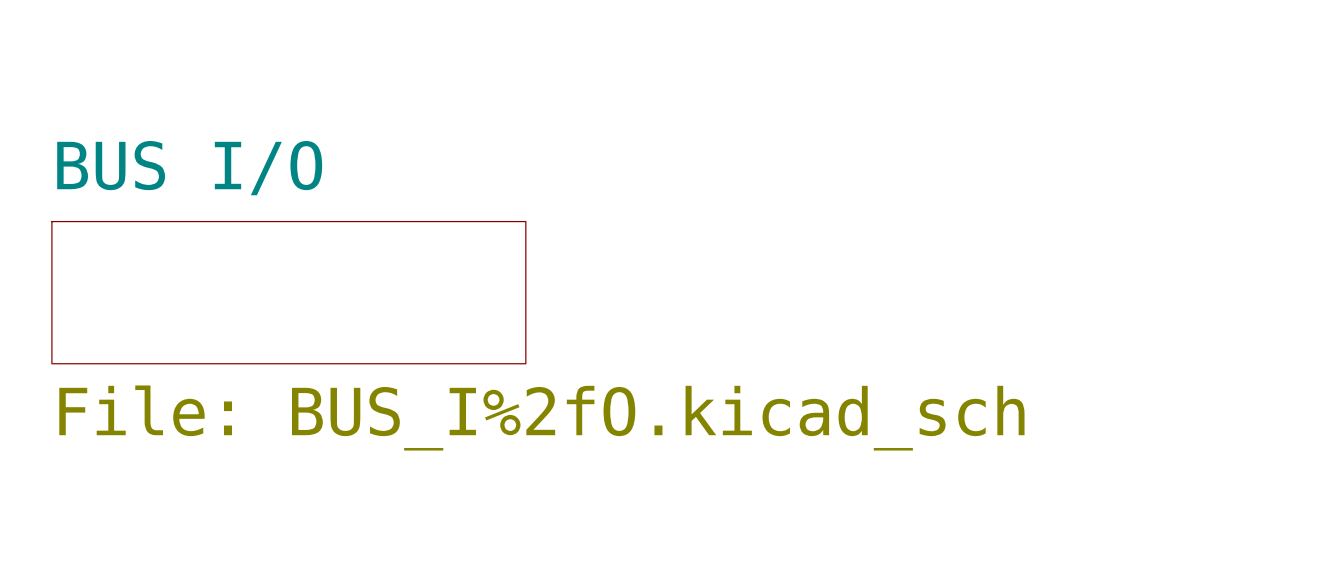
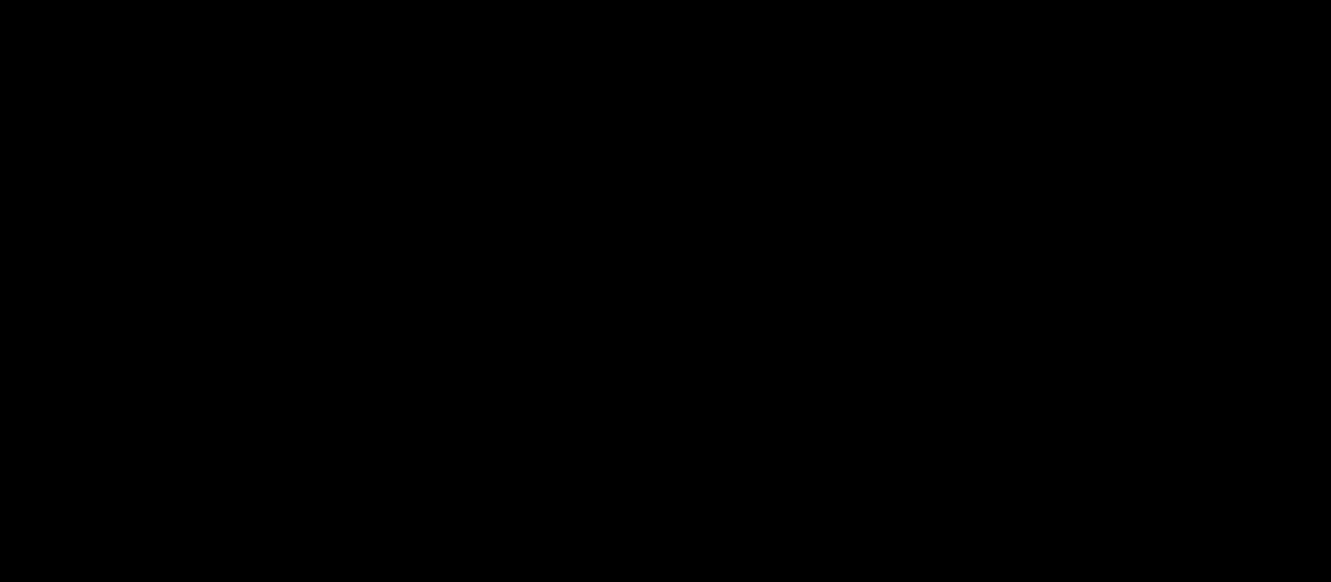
sheet BUS I/O: File: BUS_I%2fO.kicad_sch (288, 292) -> none

